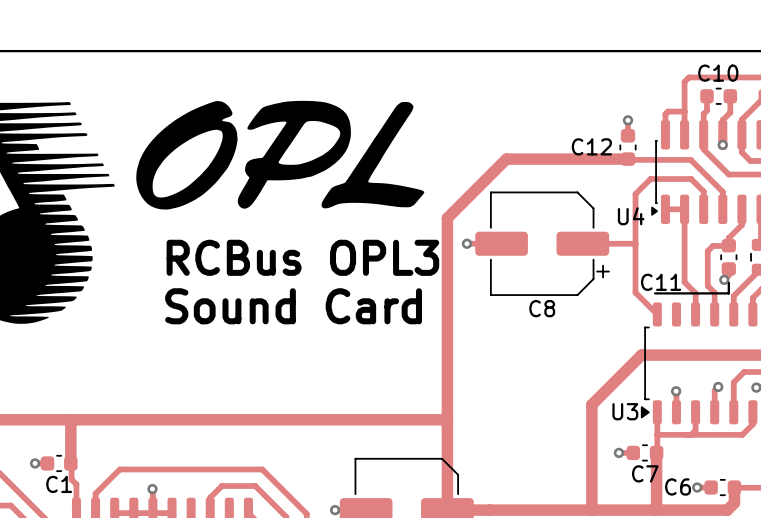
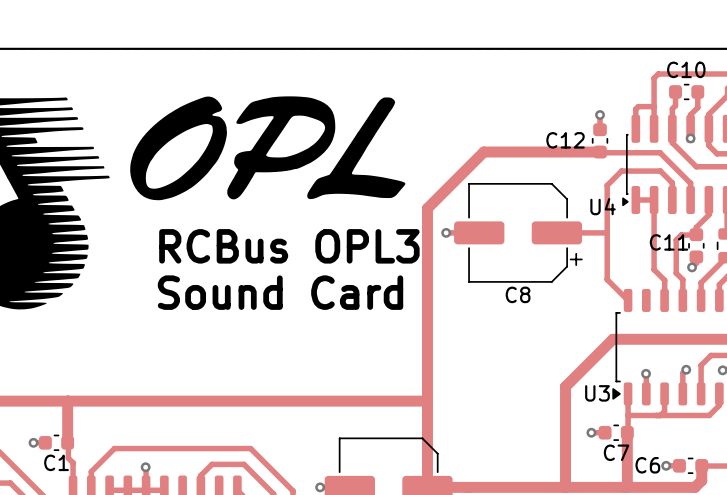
C11 name position: C11 (661, 282) -> C11 (669, 242)
line: (728, 282) (728, 293) (655, 293) -> none

